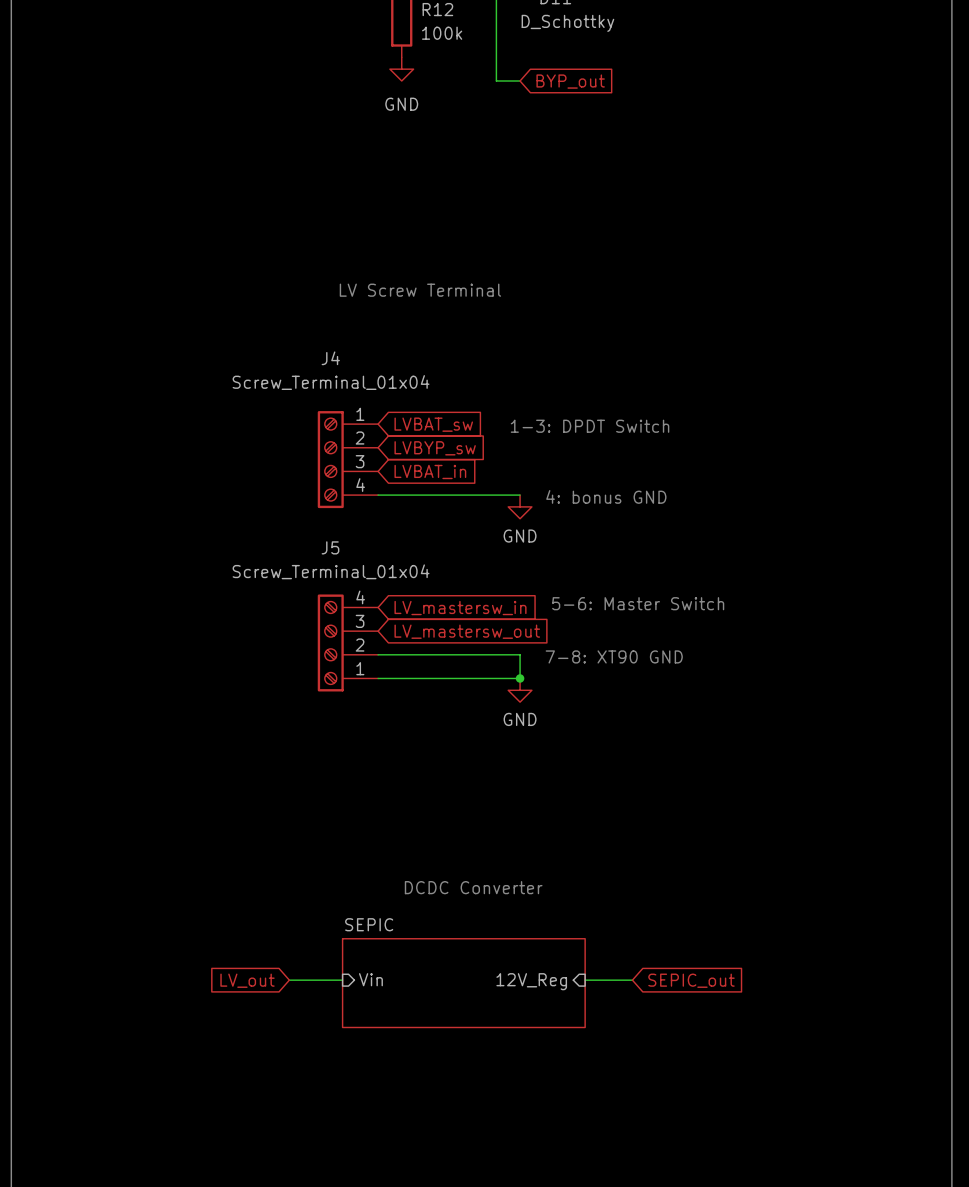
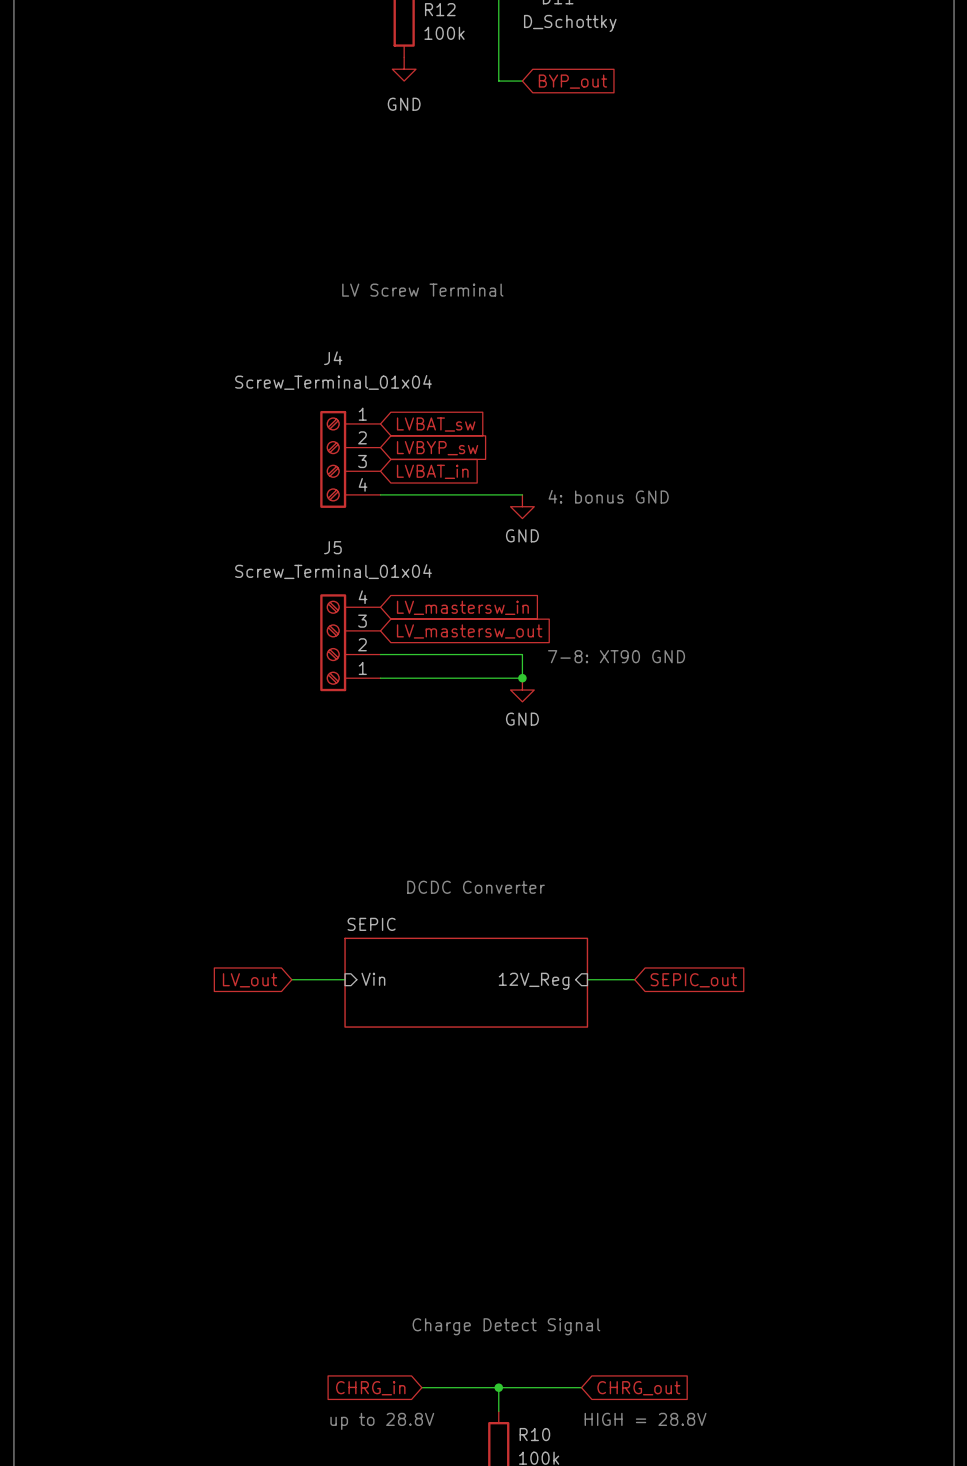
text: 1-3: DPDT Switch (590, 426) -> none
text: 5-6: Master Switch (638, 603) -> none

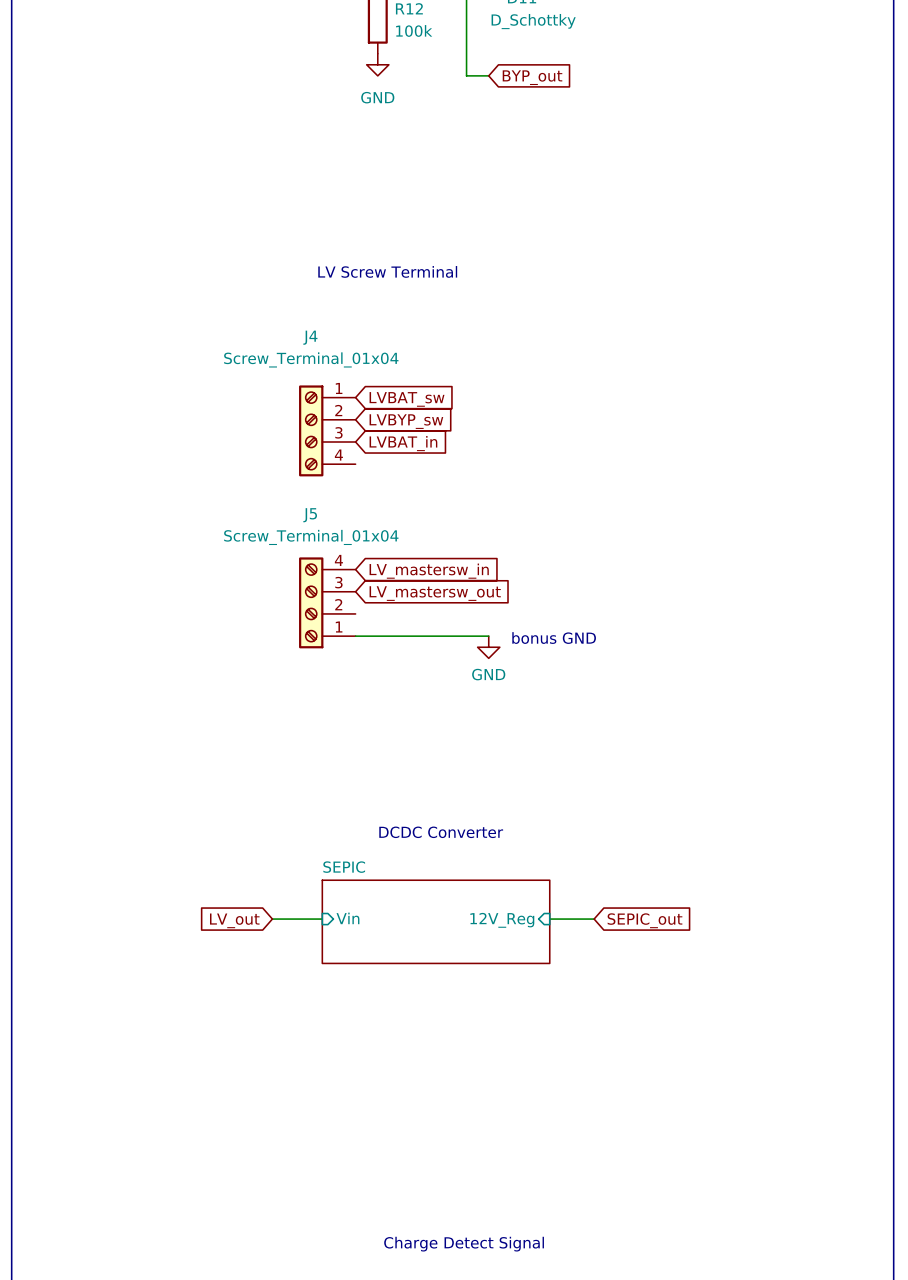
wire: (380, 494) (522, 494) -> none
text: 4: bonus GND (608, 496) -> none
power symbol: GND (522, 506) -> none
wire: (380, 654) (522, 654) (522, 678) -> none
text: 7-8: XT90 GND (616, 656) -> none
junction: (522, 678) -> none
text: none -> bonus GND (554, 638)

